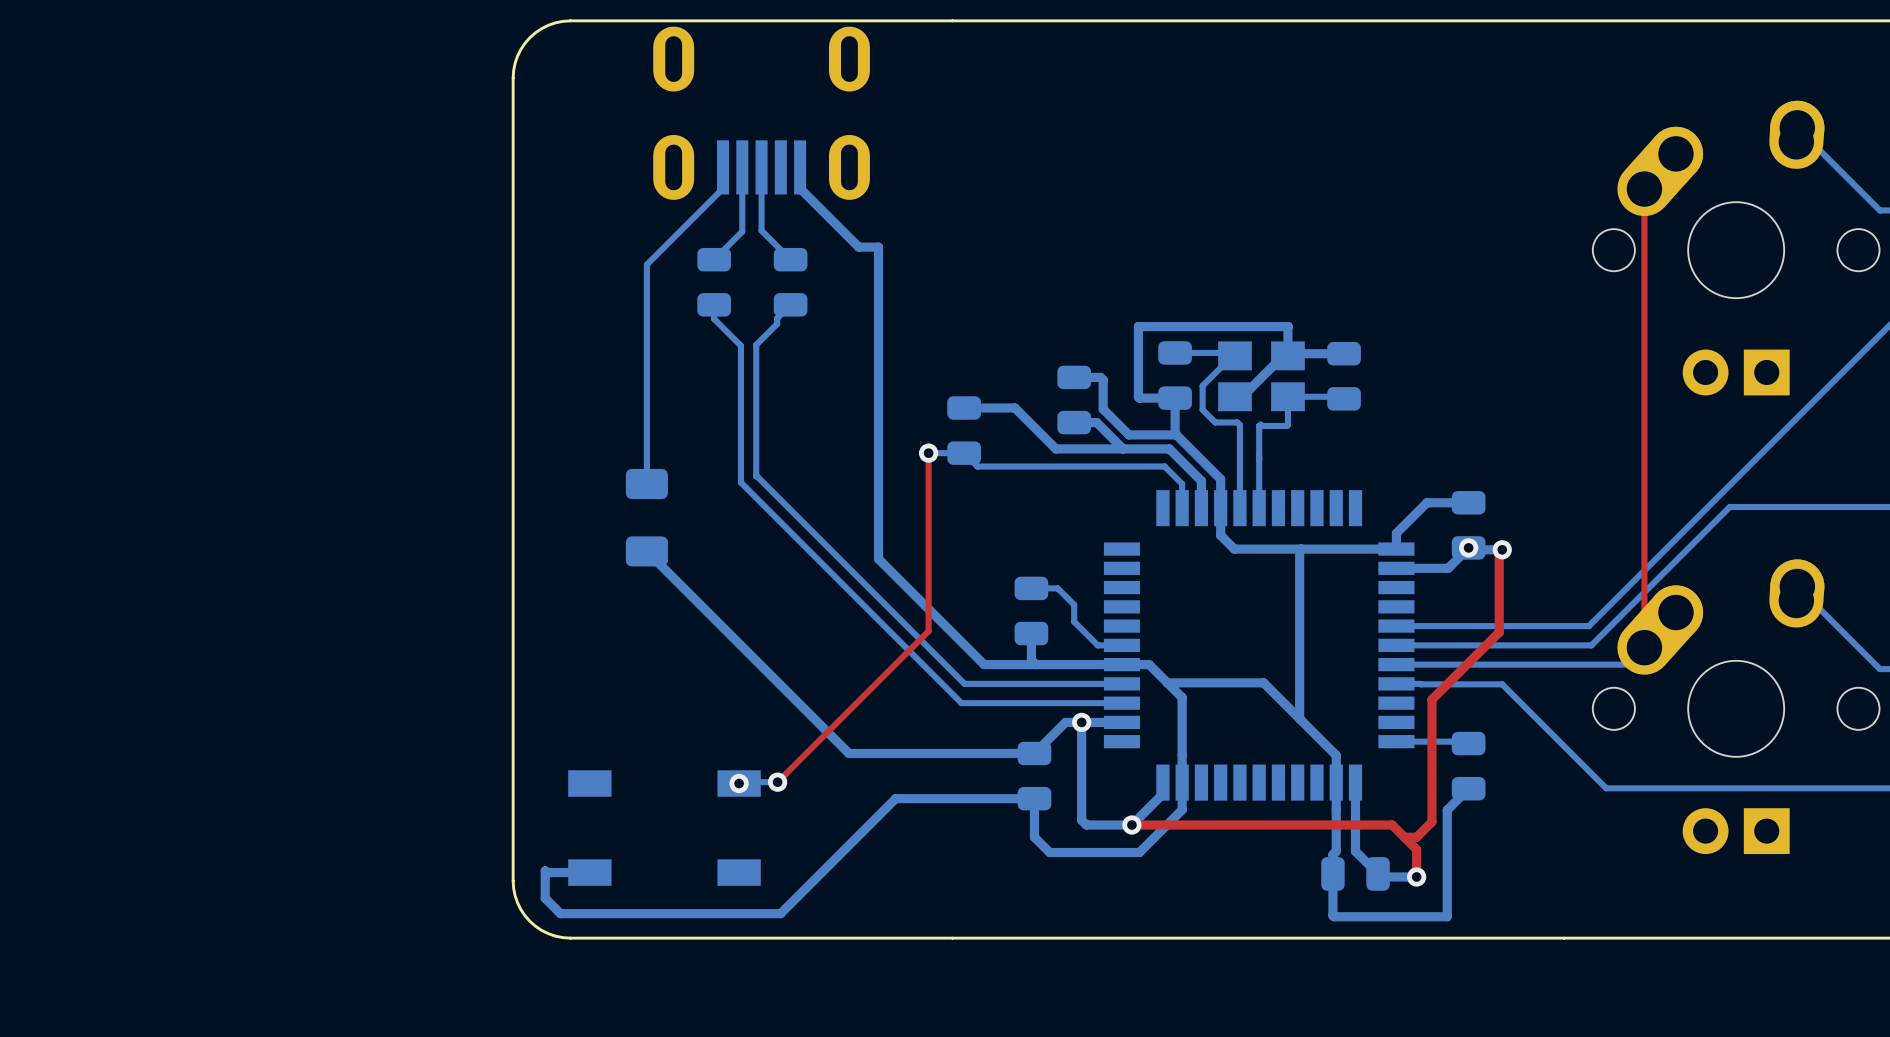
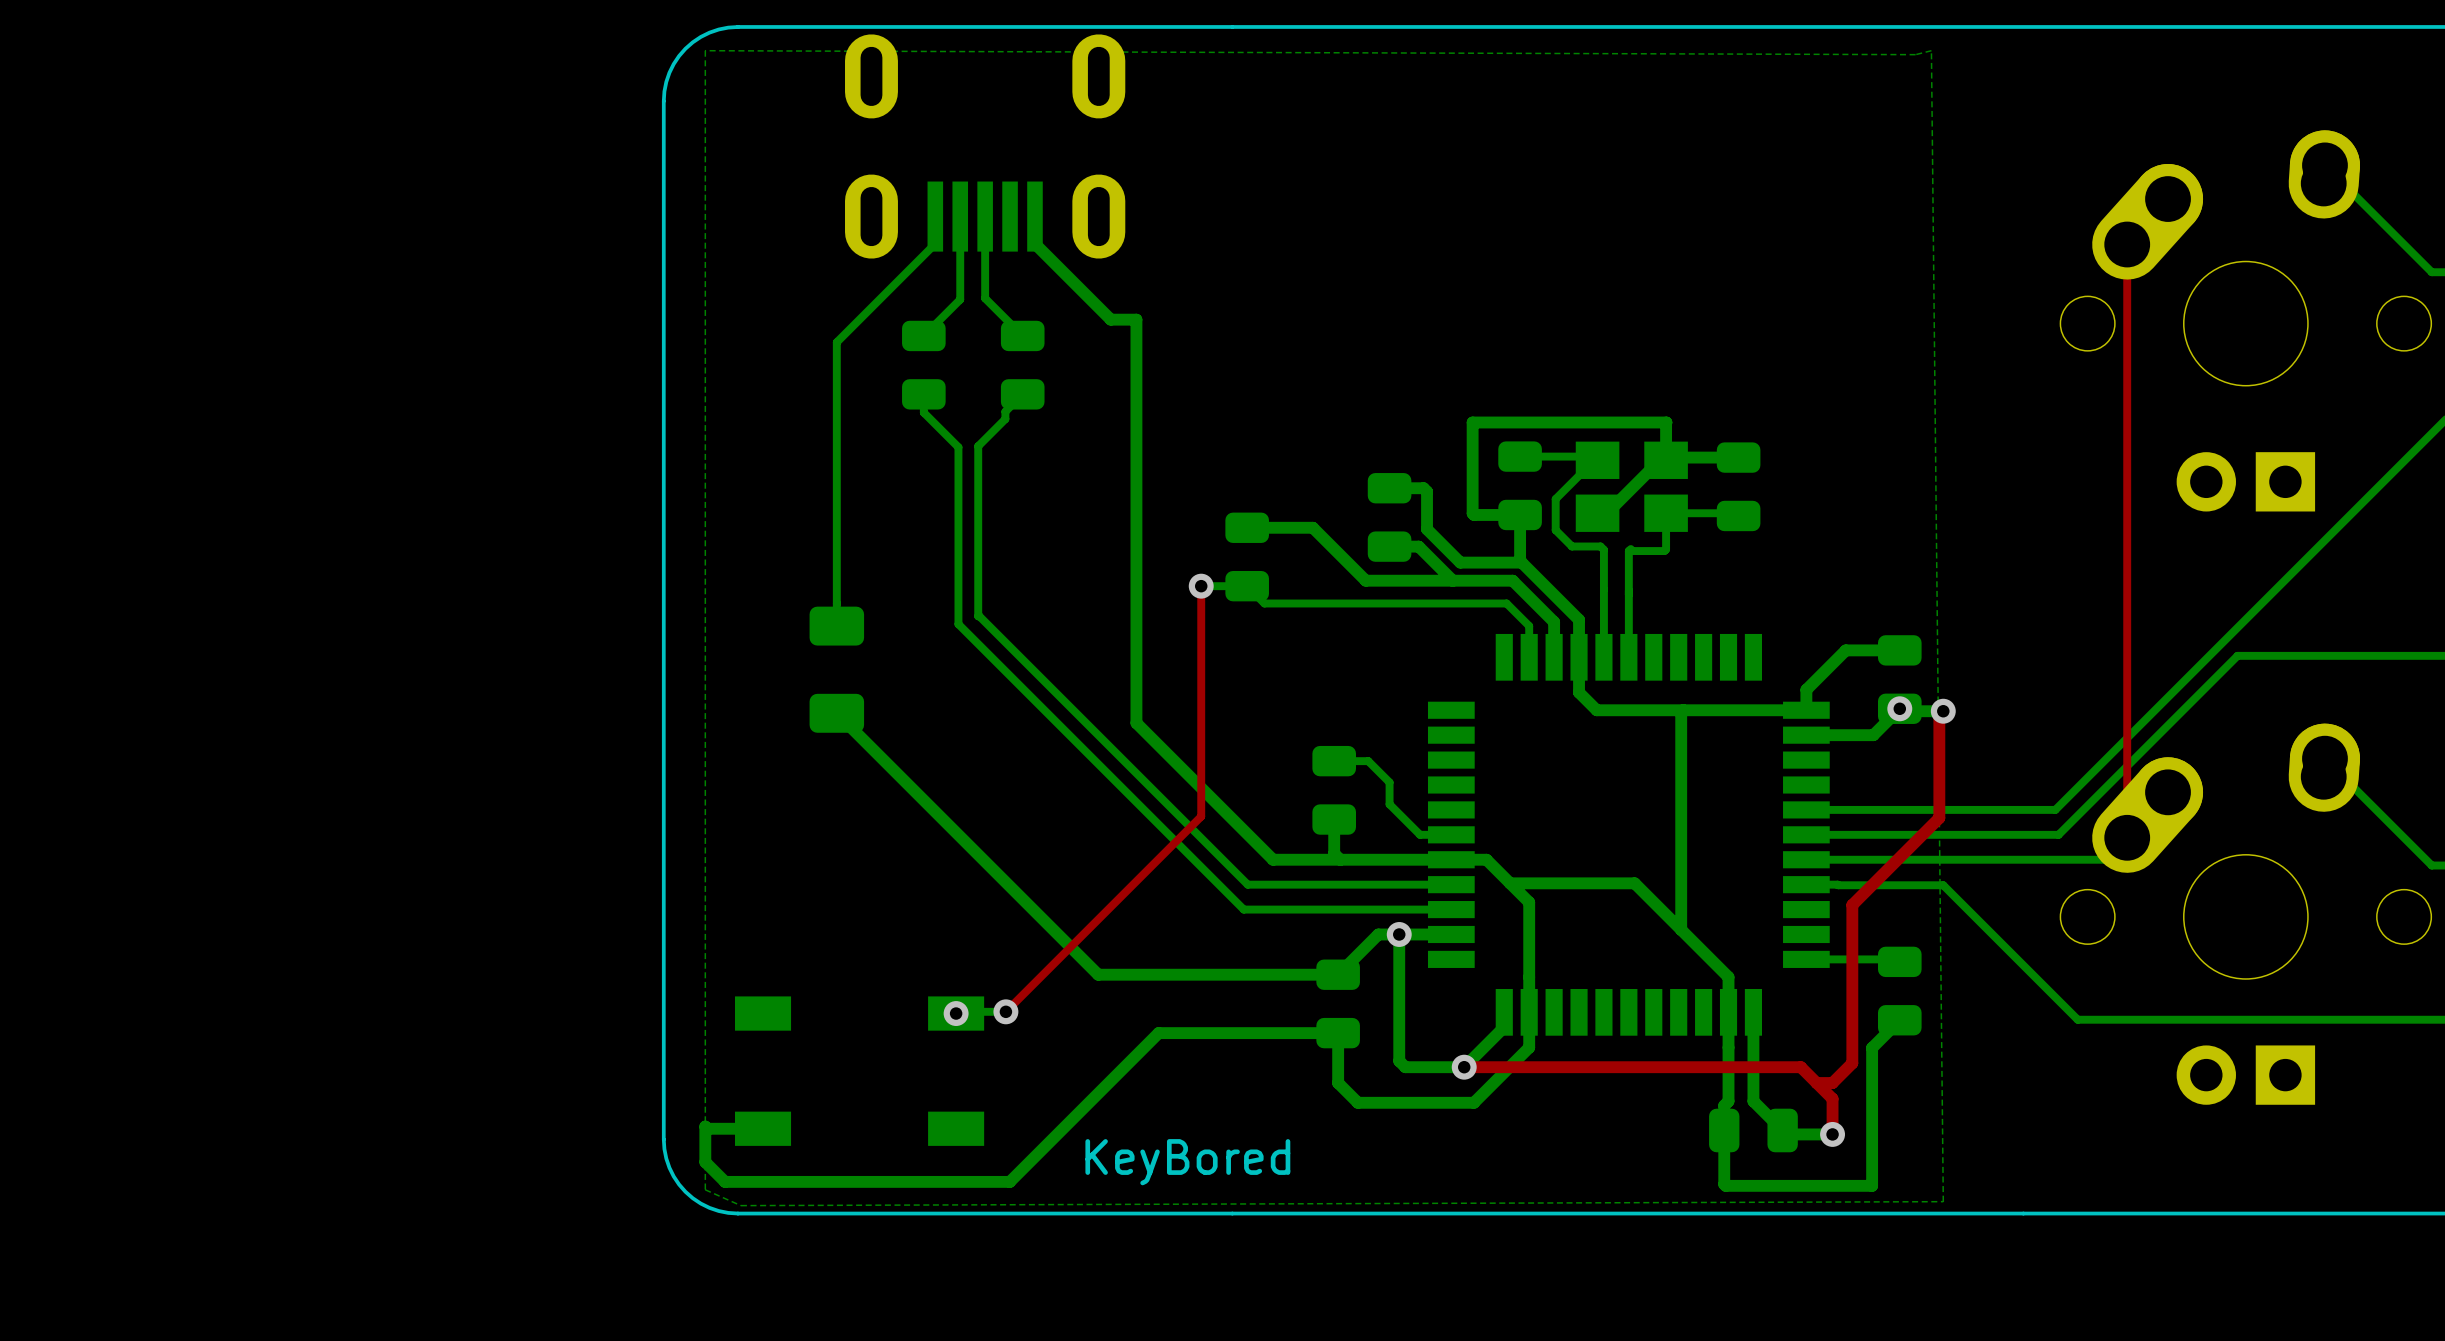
bottom zone outline: none -> (705, 50) (1915, 54) (1931, 50) (1943, 1201) (740, 1205) (705, 1189) (705, 50)
text: none -> KeyBored (1187, 1162)

